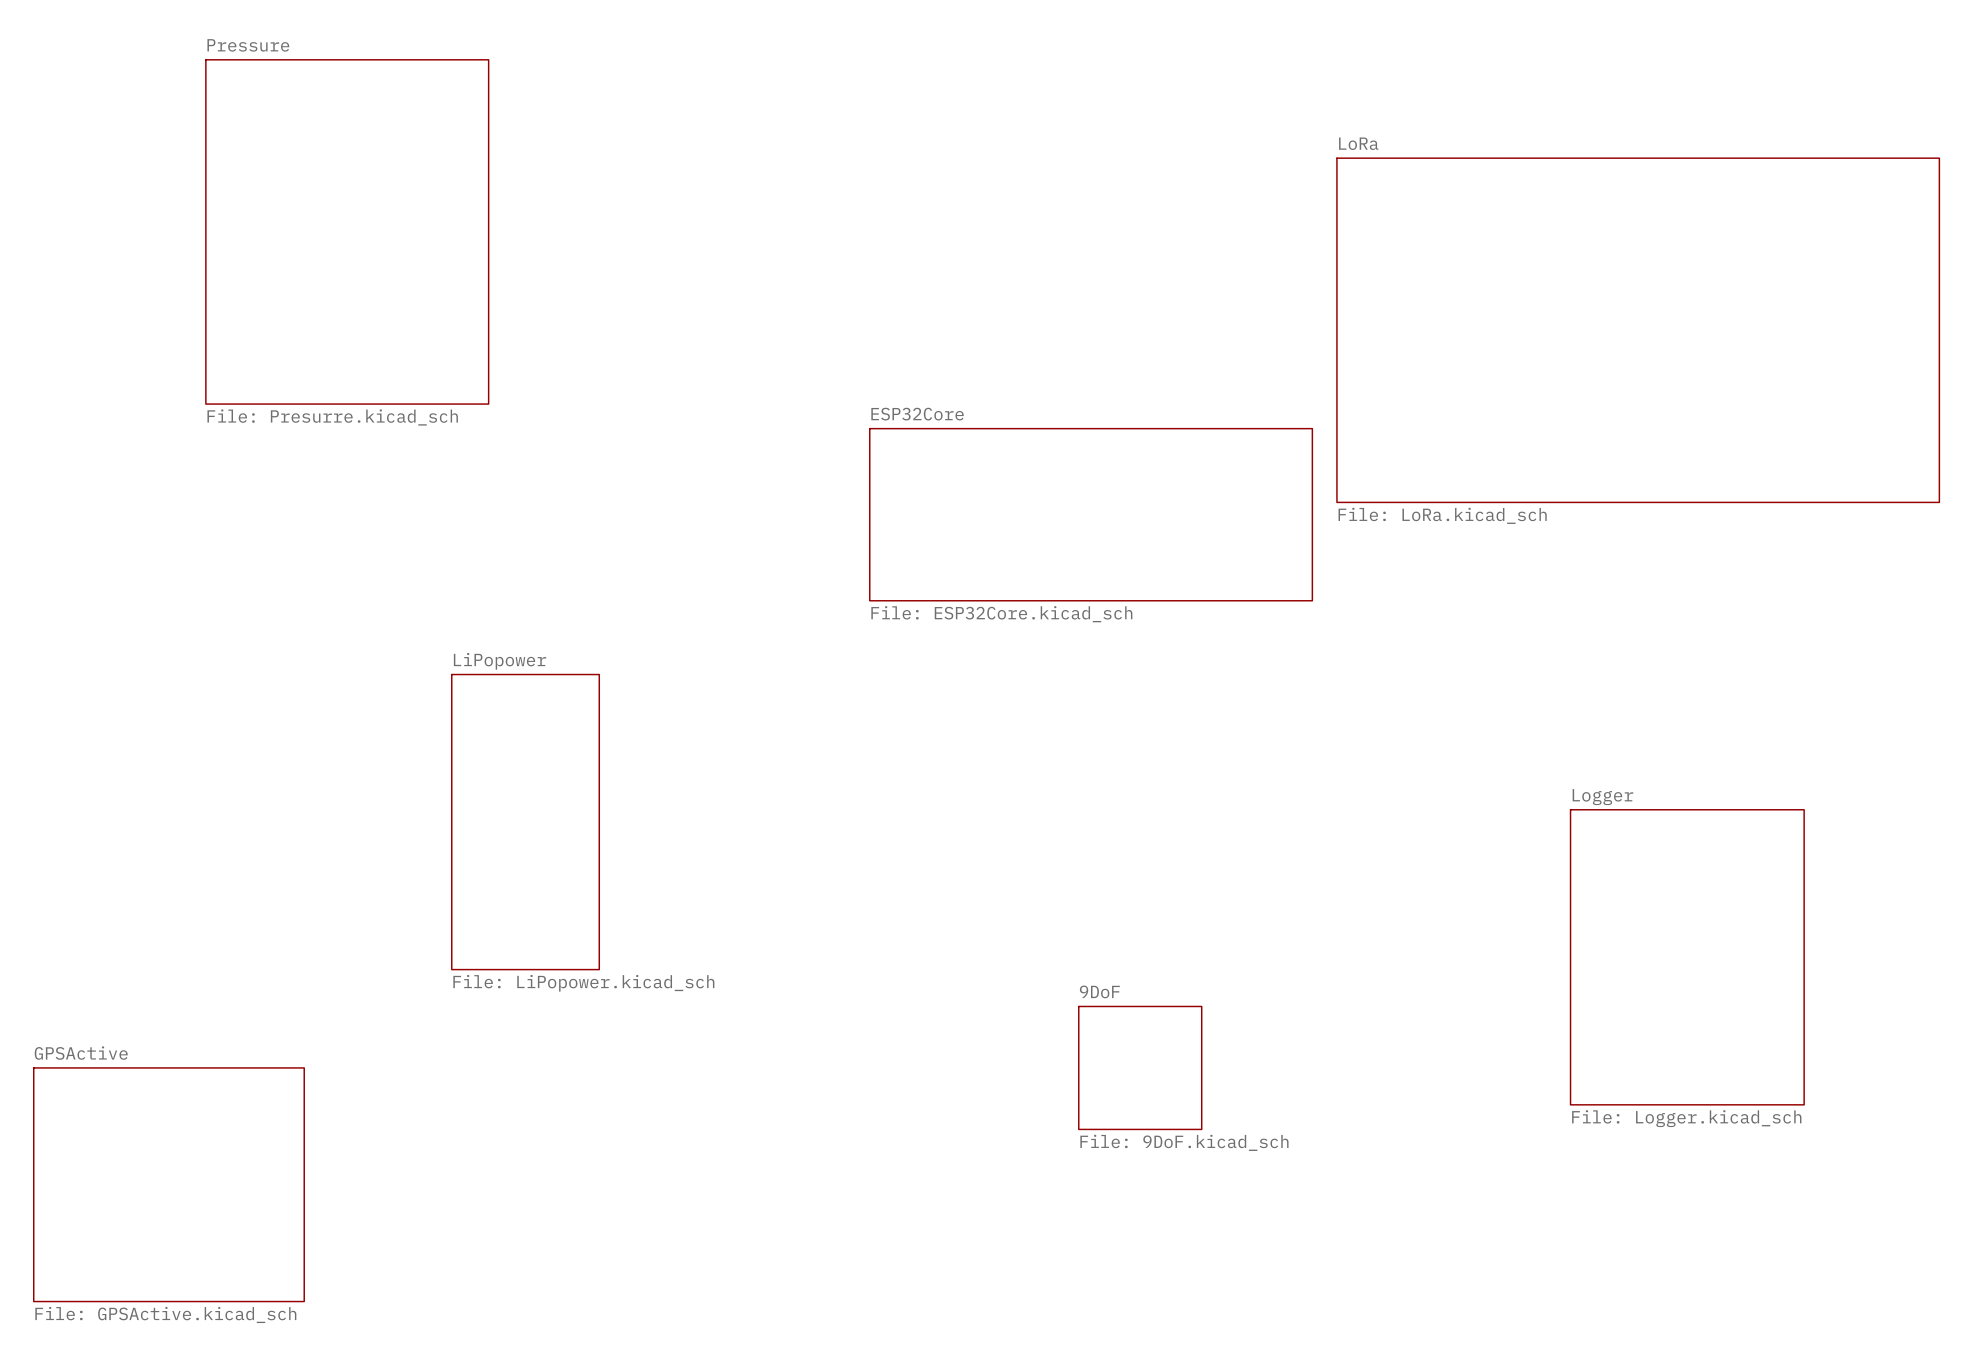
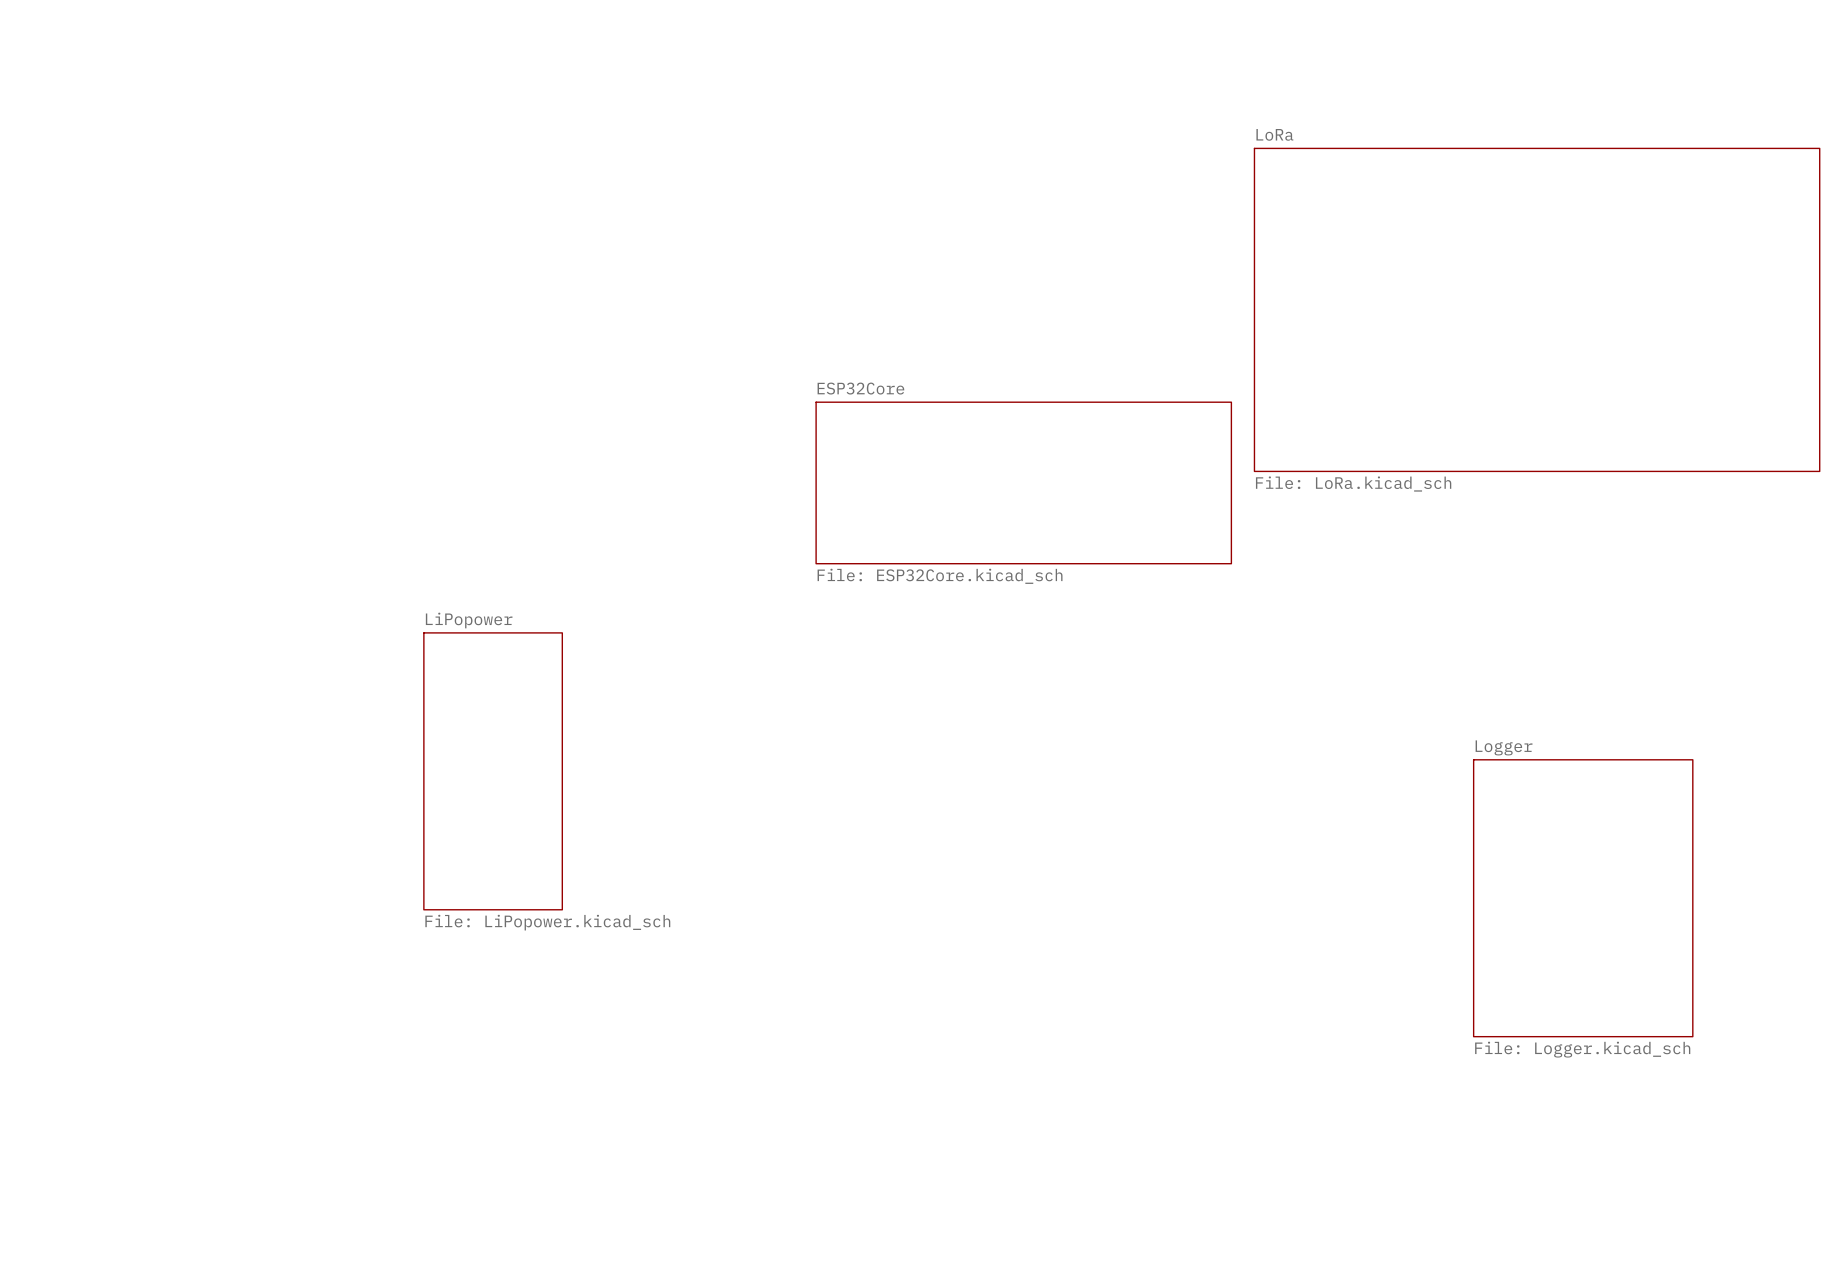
sheet Pressure: File: Presurre.kicad_sch (347, 231) -> none
sheet 9DoF: File: 9DoF.kicad_sch (1140, 1067) -> none
sheet GPSActive: File: GPSActive.kicad_sch (168, 1184) -> none

